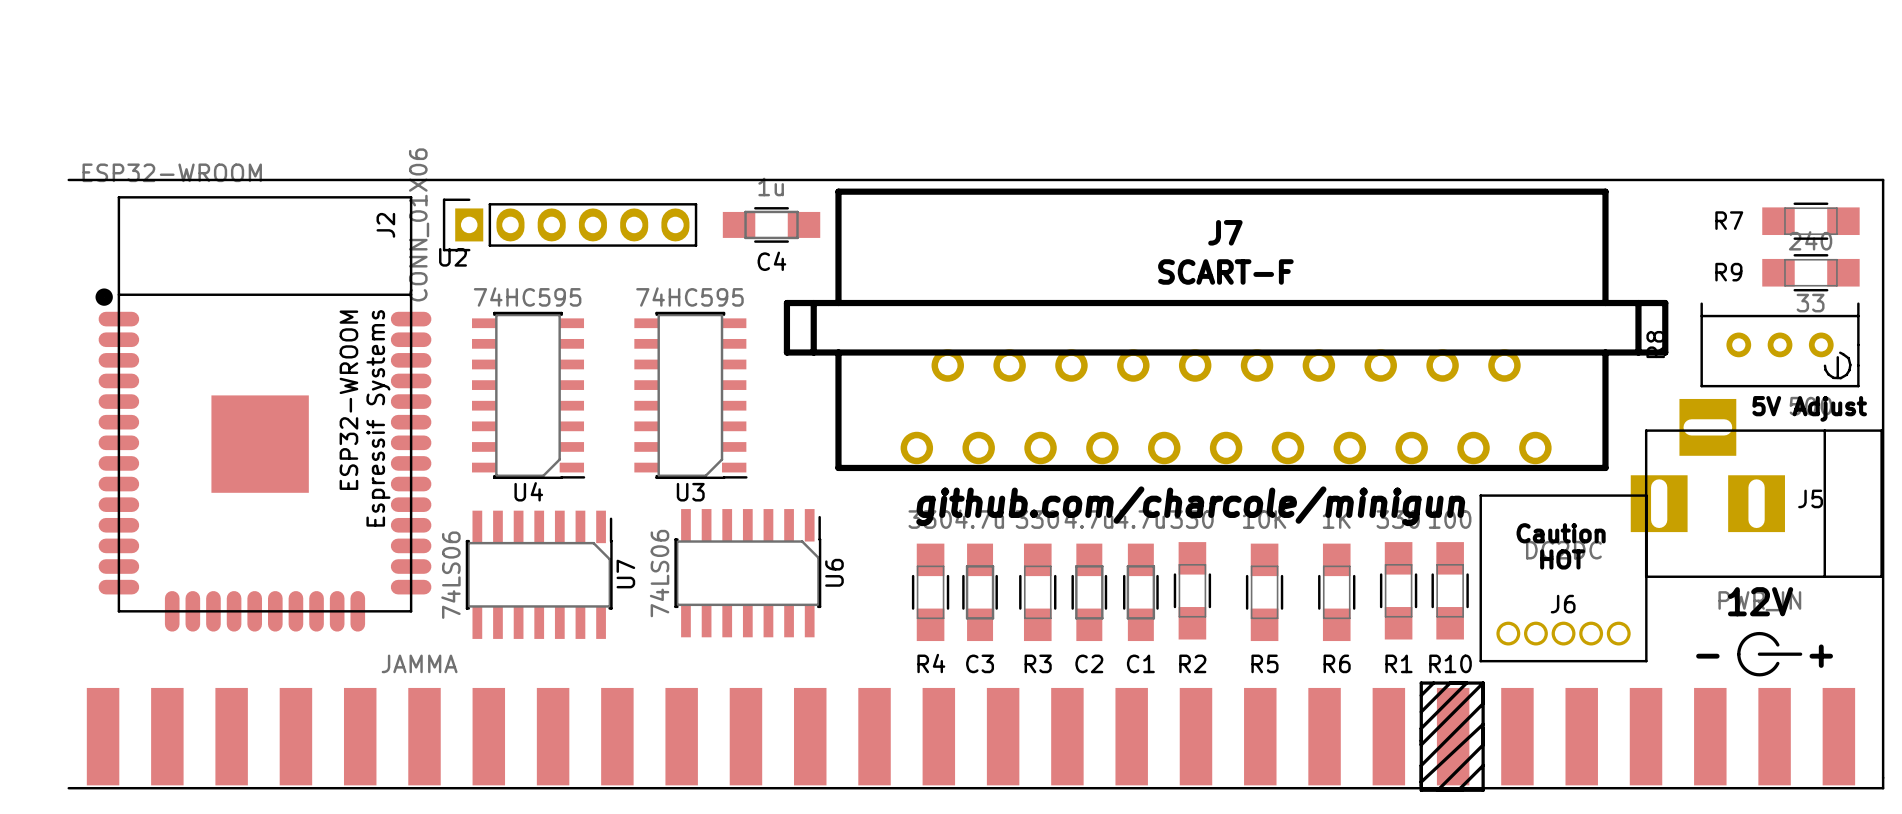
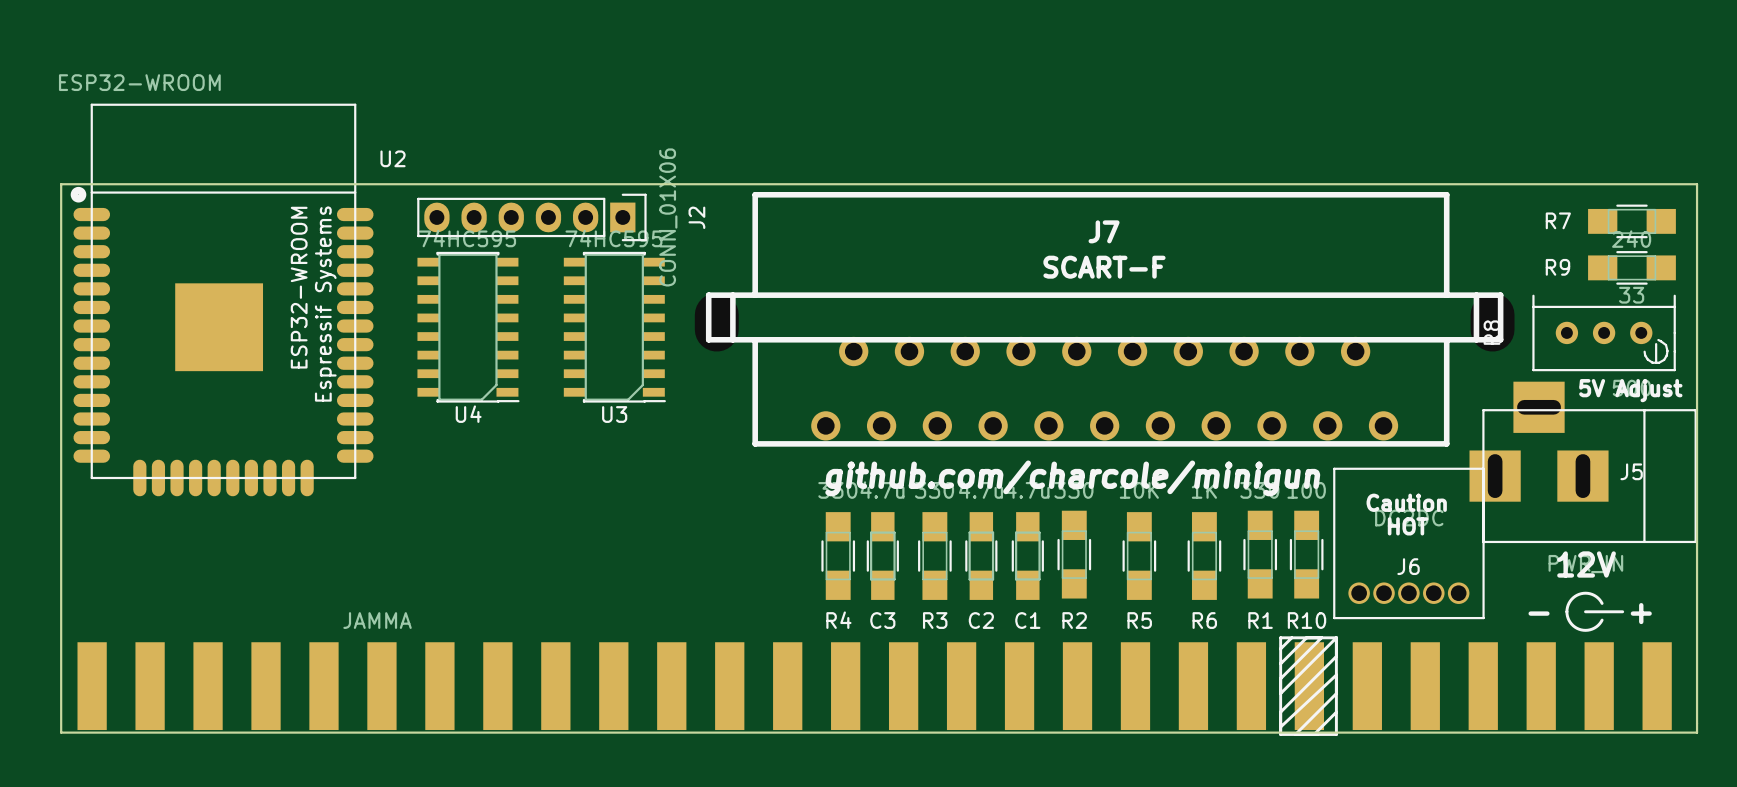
board edge: none -> (61, 184) (61, 732)
J2 rotation: 0° (570, 224) -> 180° (531, 217)
C4: 1u (771, 224) -> none
U4 position: (528, 395) -> (468, 327)
U3 position: (690, 395) -> (614, 327)
U2 position: (263, 413) -> (222, 299)
U6: 74LS06 (747, 573) -> none
U7: 74LS06 (539, 574) -> none

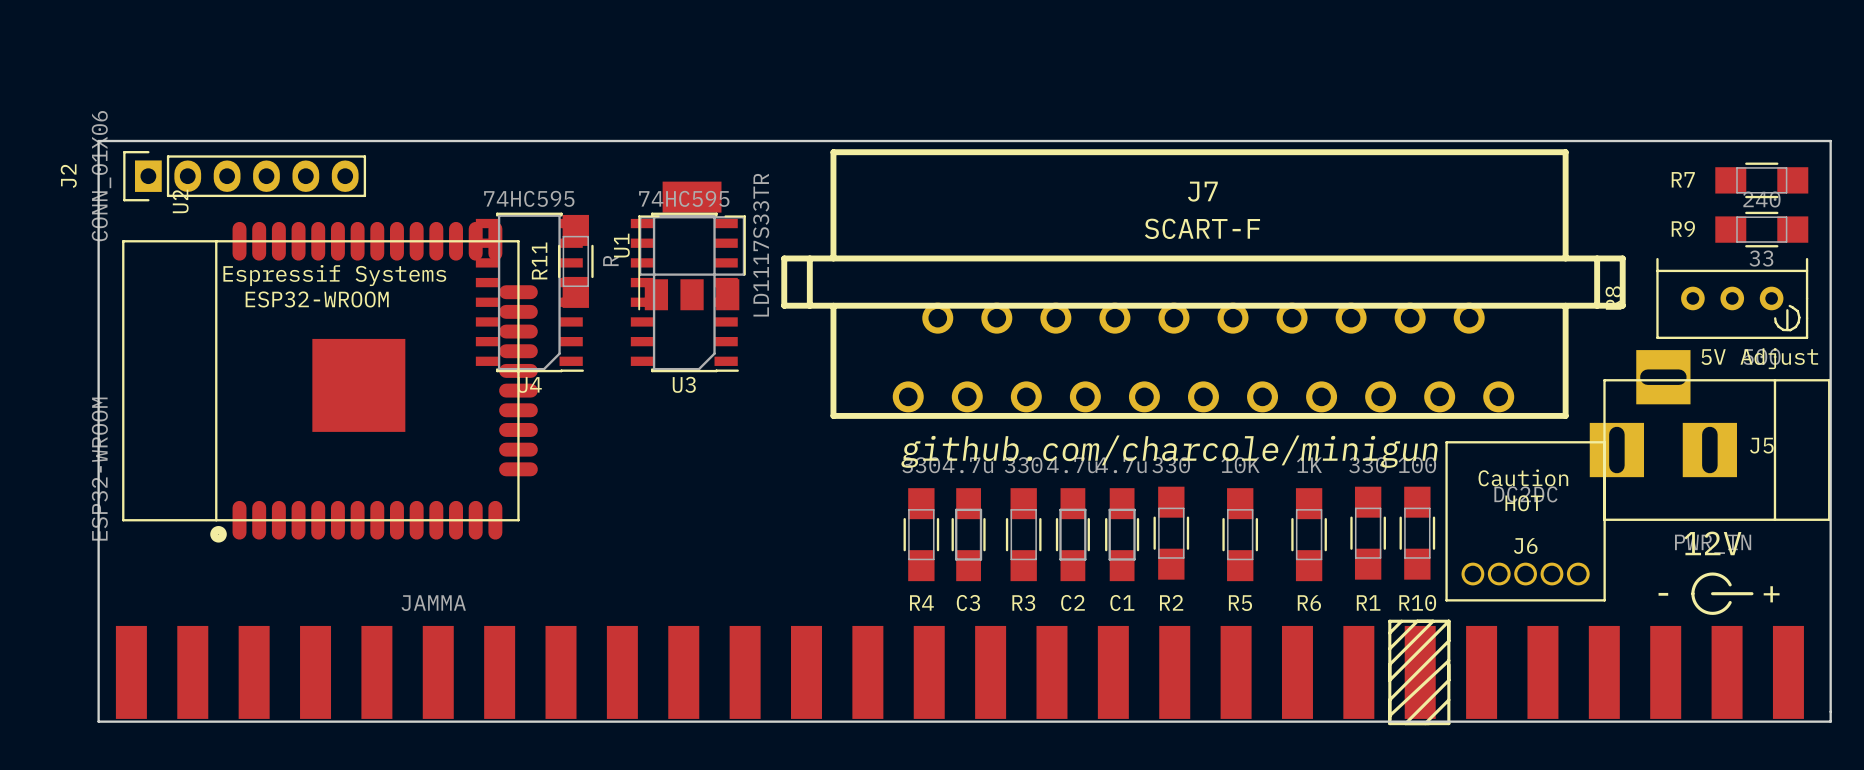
J2 rotation: 0° (531, 217) -> 180° (244, 176)
J2 position: (531, 217) -> (244, 176)
U1: none -> LD1117S33TR (692, 246)
R11: none -> R (575, 261)
U2 rotation: 0° (222, 299) -> 90° counterclockwise (329, 382)

